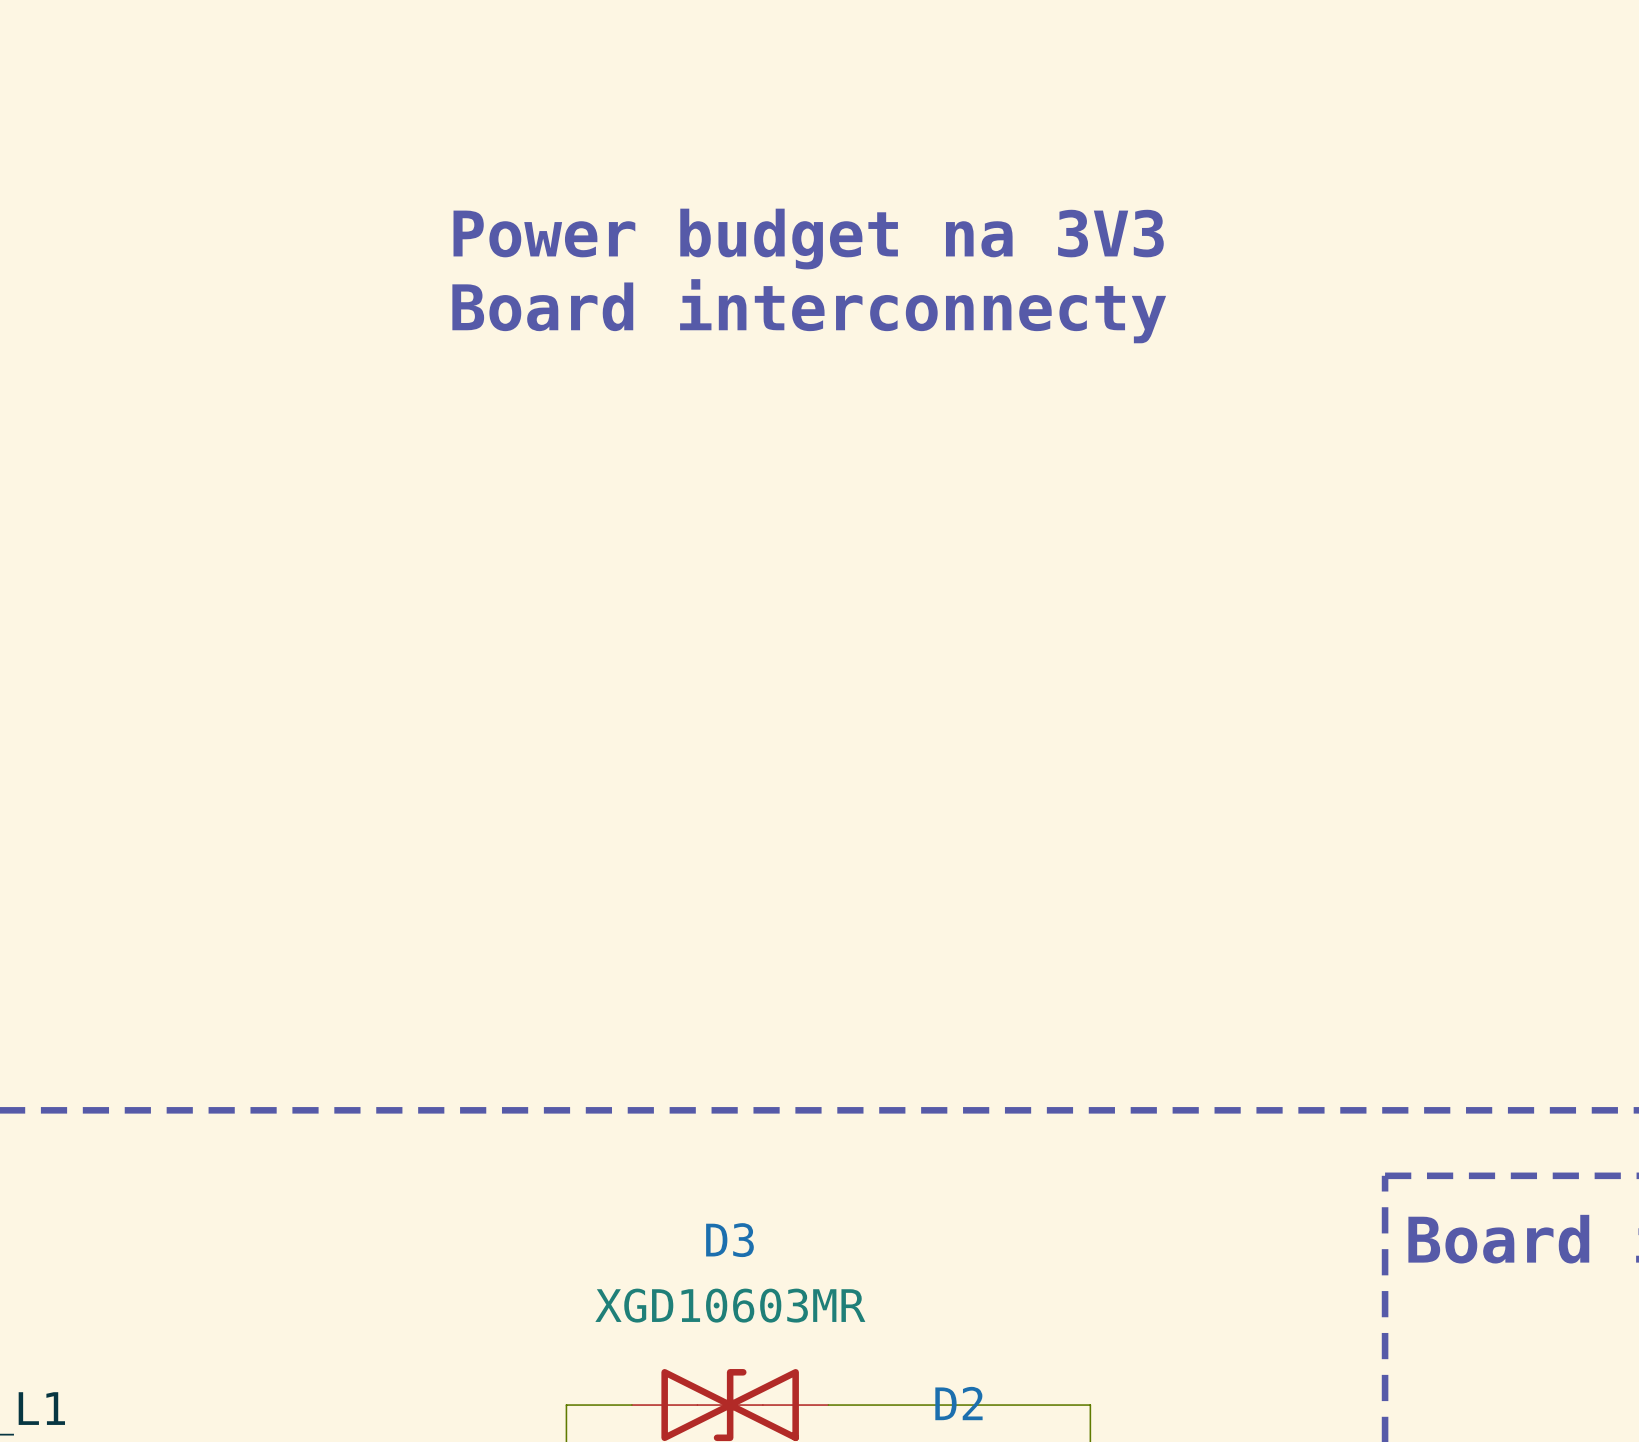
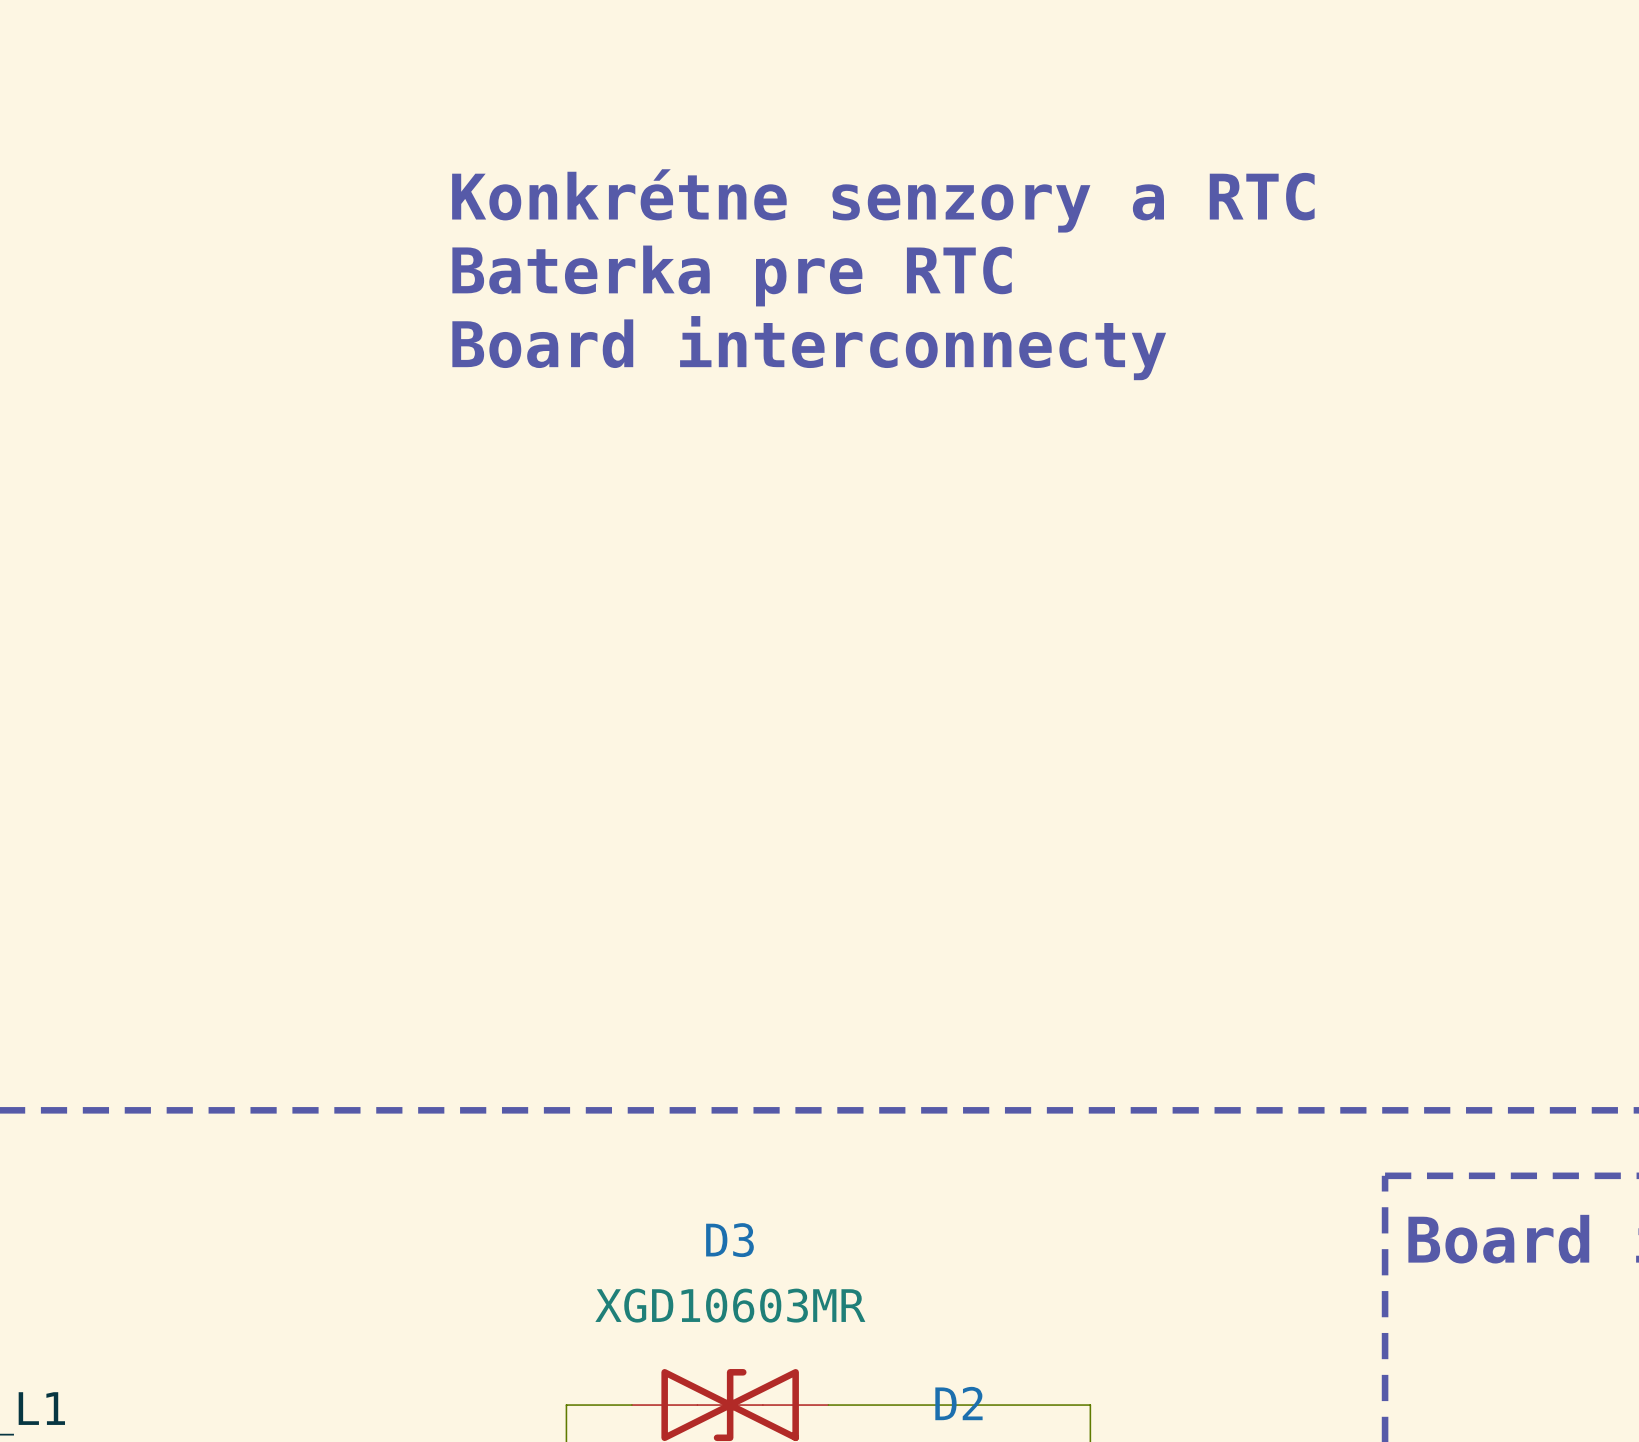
text: none -> Konkrétne senzory a RTC (883, 200)
text: Power budget na 3V3 (808, 239) -> none
text: none -> Baterka pre RTC (732, 275)
text position: Board interconnecty (809, 311) -> Board interconnecty (809, 348)

